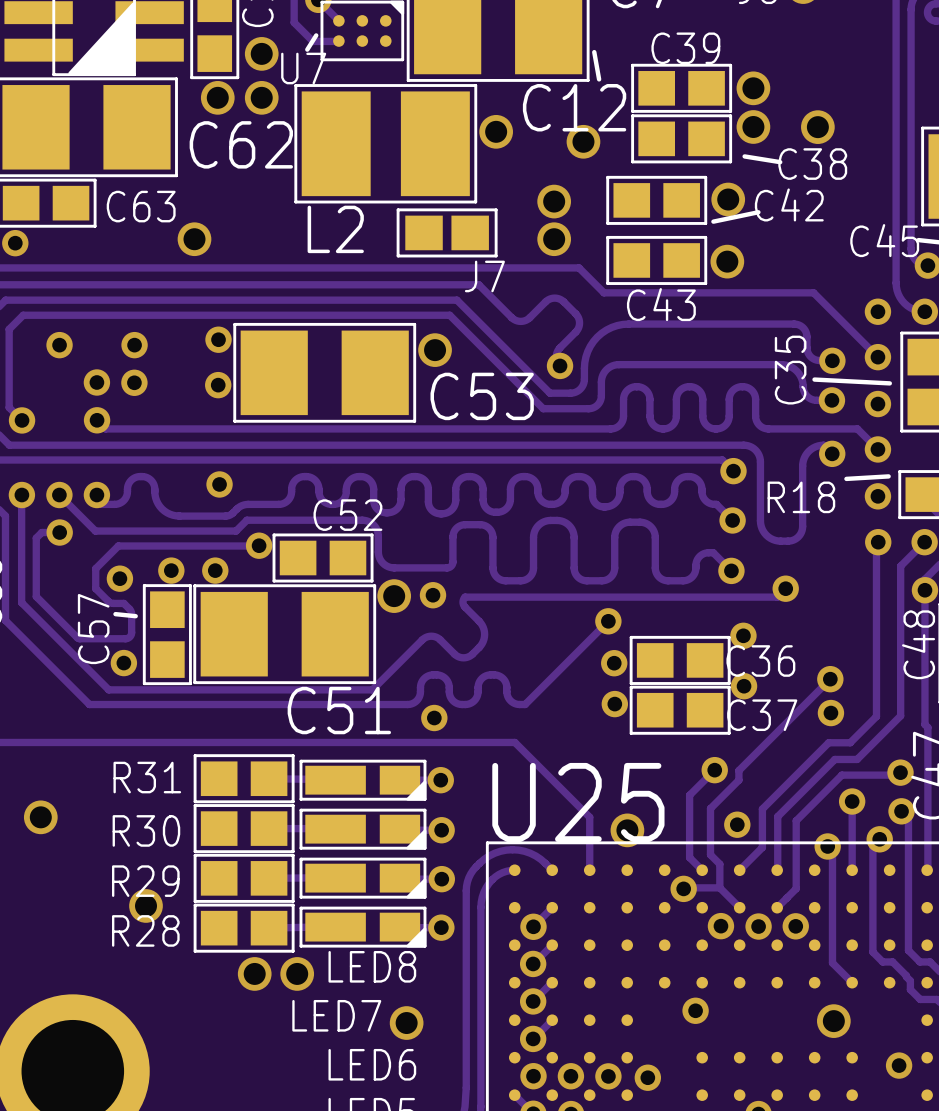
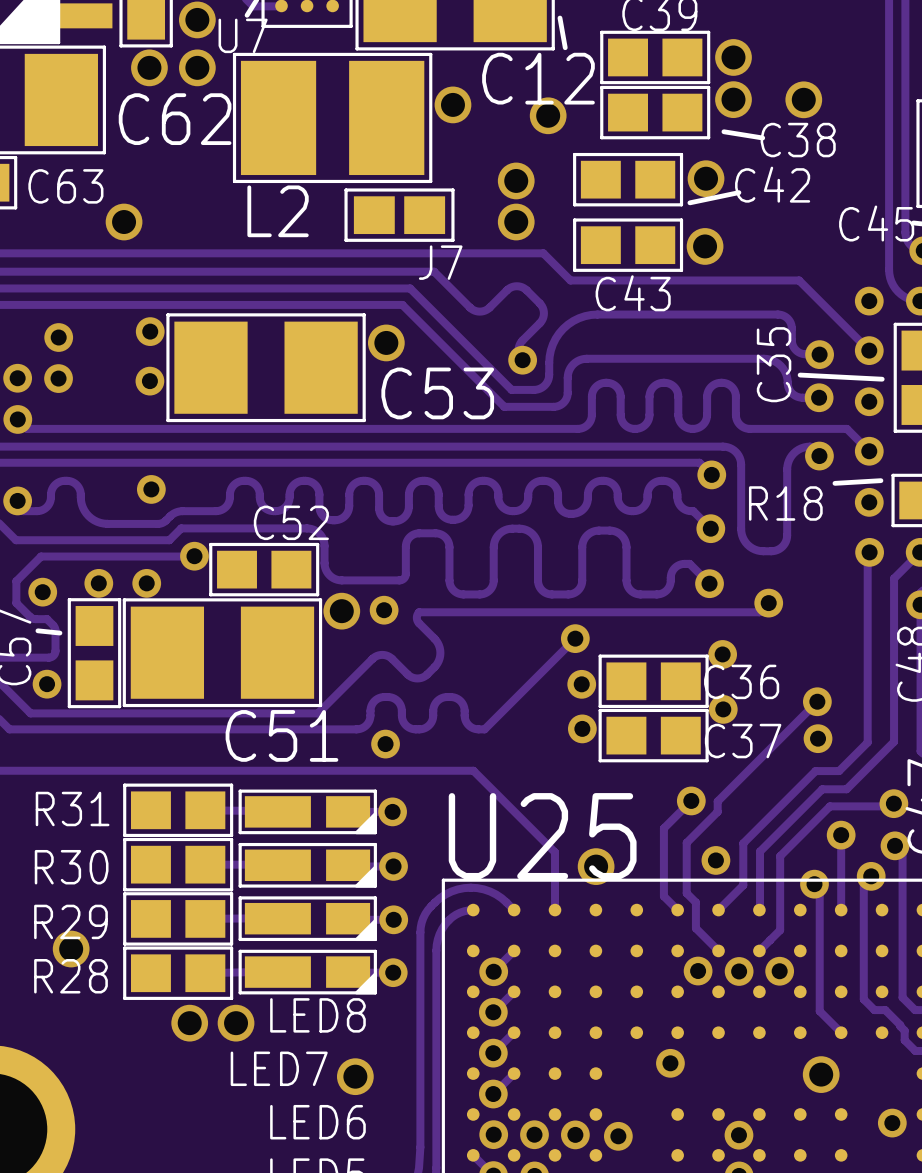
track: (718, 863) (719, 887) (683, 888) -> (695, 902) (696, 929)
via position: (683, 888) -> (738, 1135)

